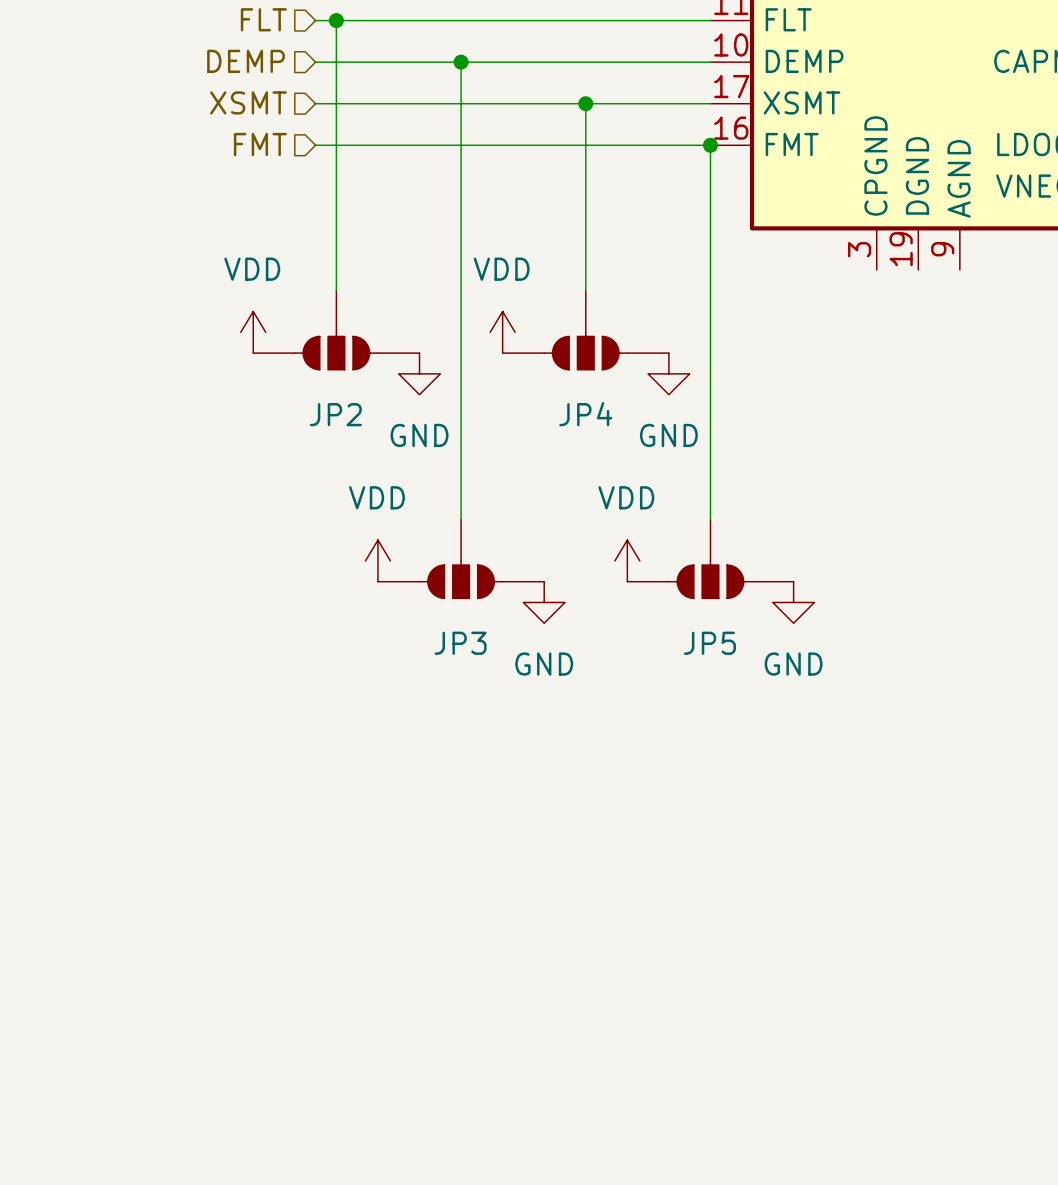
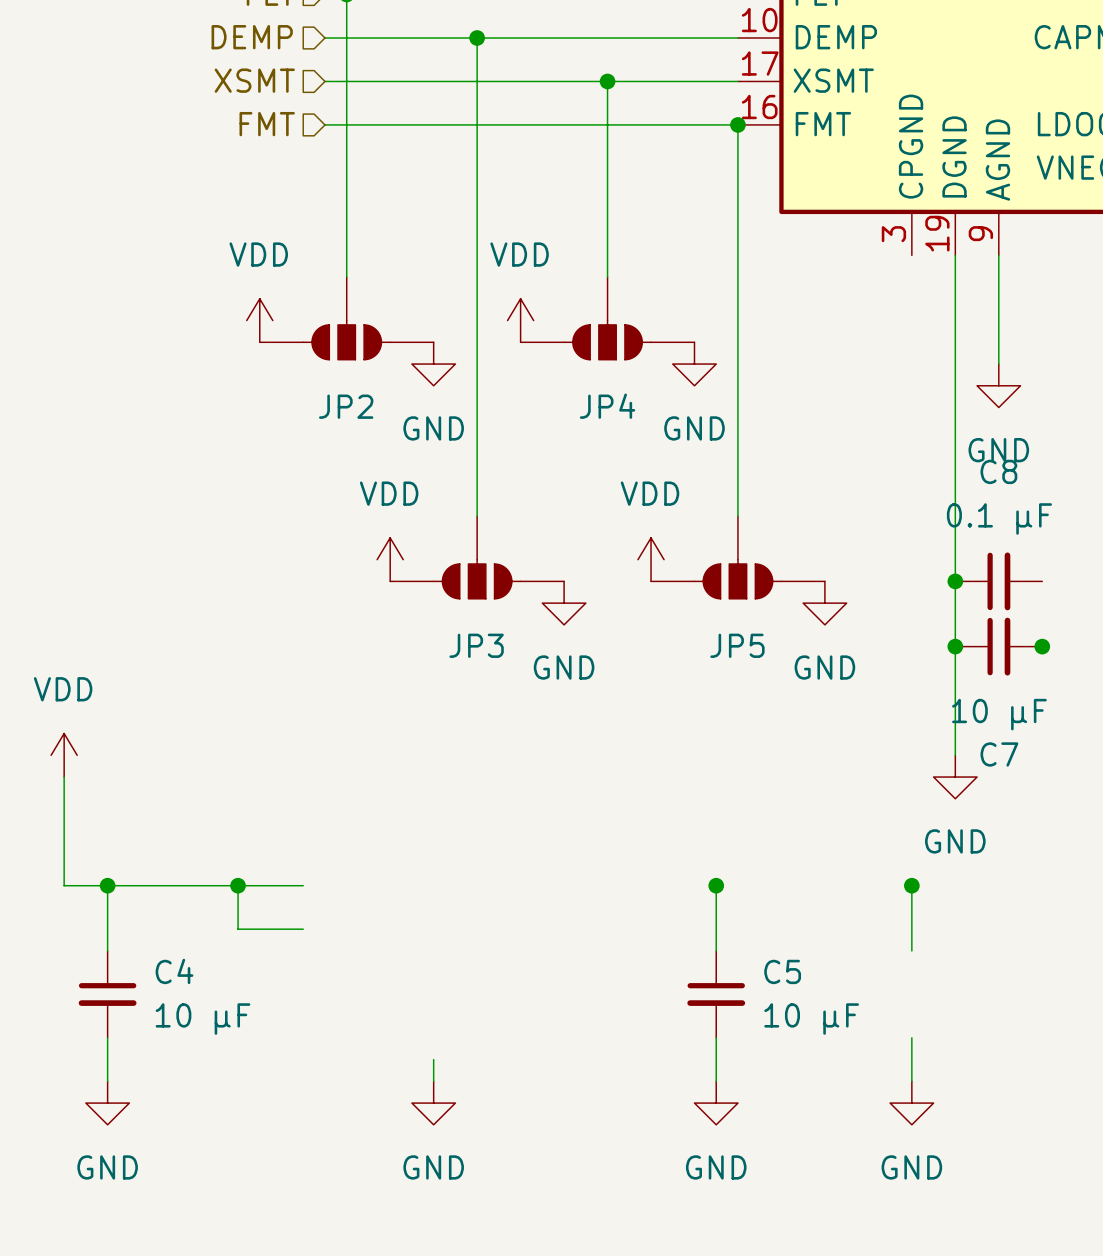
wire: none -> (955, 255) (955, 755)
wire: none -> (998, 255) (998, 364)
power symbol: none -> GND (998, 385)
junction: none -> (955, 581)
C8: none -> 0.1 μF (998, 581)
junction: none -> (955, 646)
C7: none -> 10 μF (998, 646)
junction: none -> (1042, 646)
power symbol: none -> VDD (64, 755)
wire: none -> (64, 777) (64, 885) (303, 885)
power symbol: none -> GND (955, 777)
wire: none -> (107, 885) (107, 950)
junction: none -> (107, 885)
wire: none -> (238, 885) (238, 929) (303, 929)
junction: none -> (238, 885)
wire: none -> (716, 885) (716, 950)
junction: none -> (716, 885)
wire: none -> (911, 885) (911, 950)
junction: none -> (911, 885)
C4: none -> 10 μF (107, 994)
C5: none -> 10 μF (716, 994)
wire: none -> (107, 1037) (107, 1081)
wire: none -> (716, 1037) (716, 1081)
wire: none -> (911, 1037) (911, 1081)
wire: none -> (433, 1059) (433, 1081)
power symbol: none -> GND (107, 1103)
power symbol: none -> GND (433, 1103)
power symbol: none -> GND (716, 1103)
power symbol: none -> GND (911, 1103)

